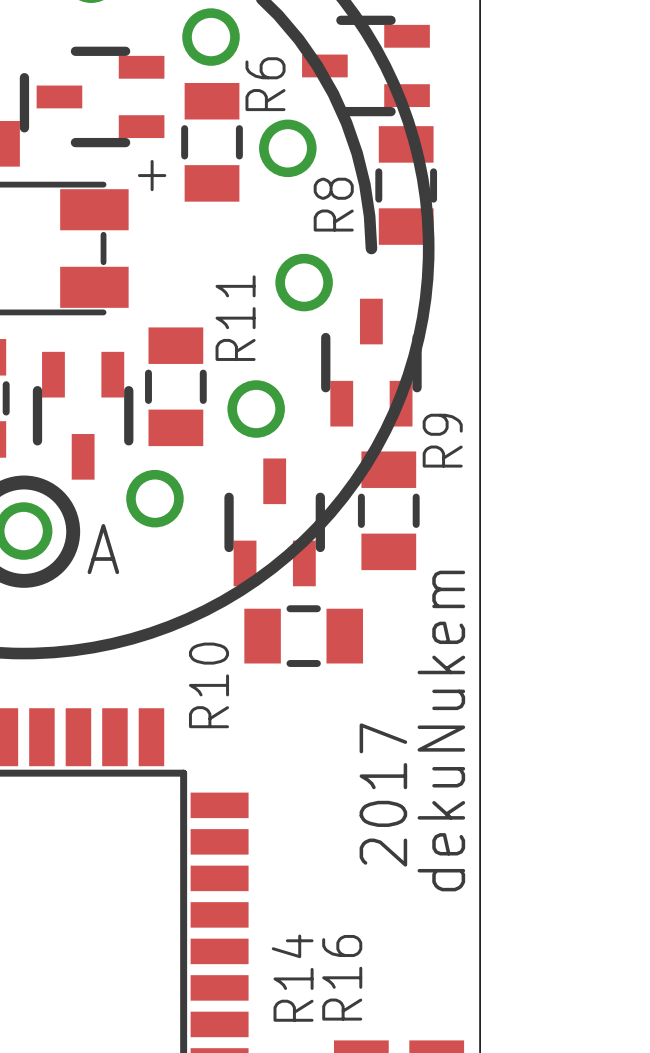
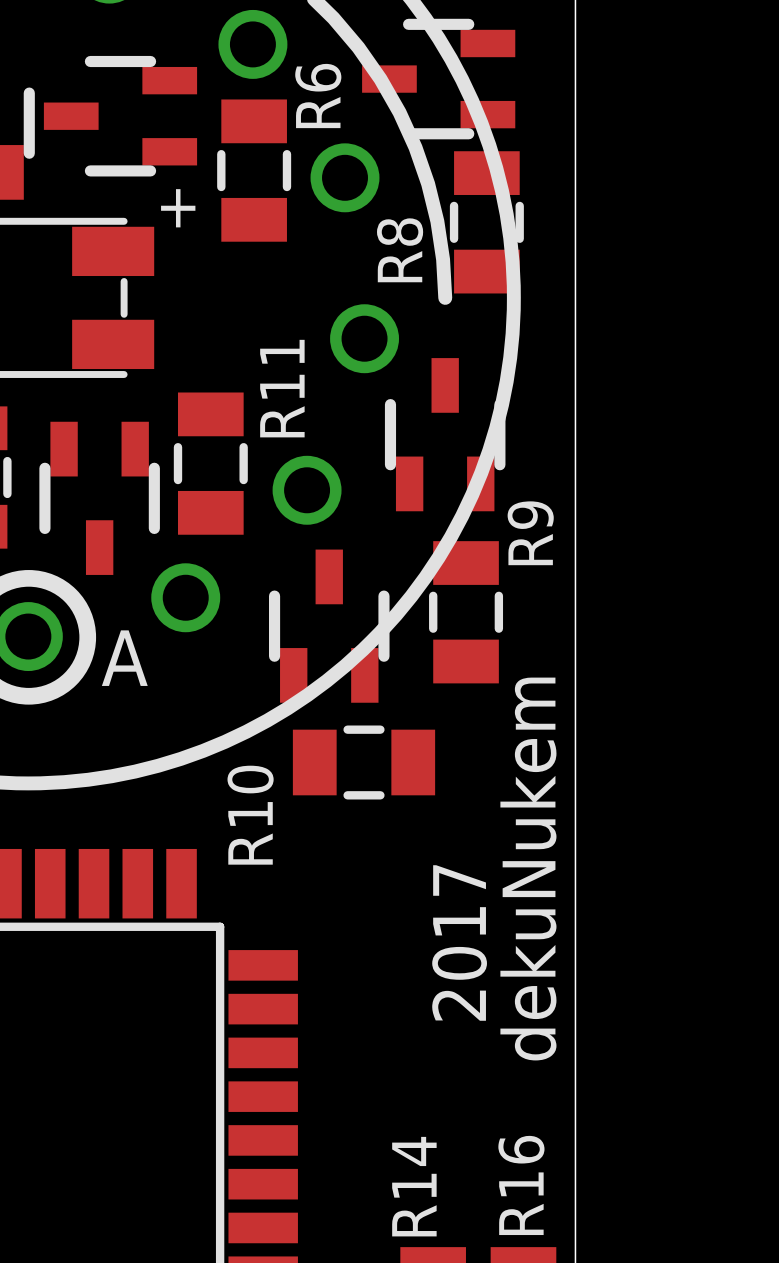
R16 name position: R16 (342, 977) -> R16 (521, 1185)
R14 name position: R14 (292, 978) -> R14 (414, 1186)

